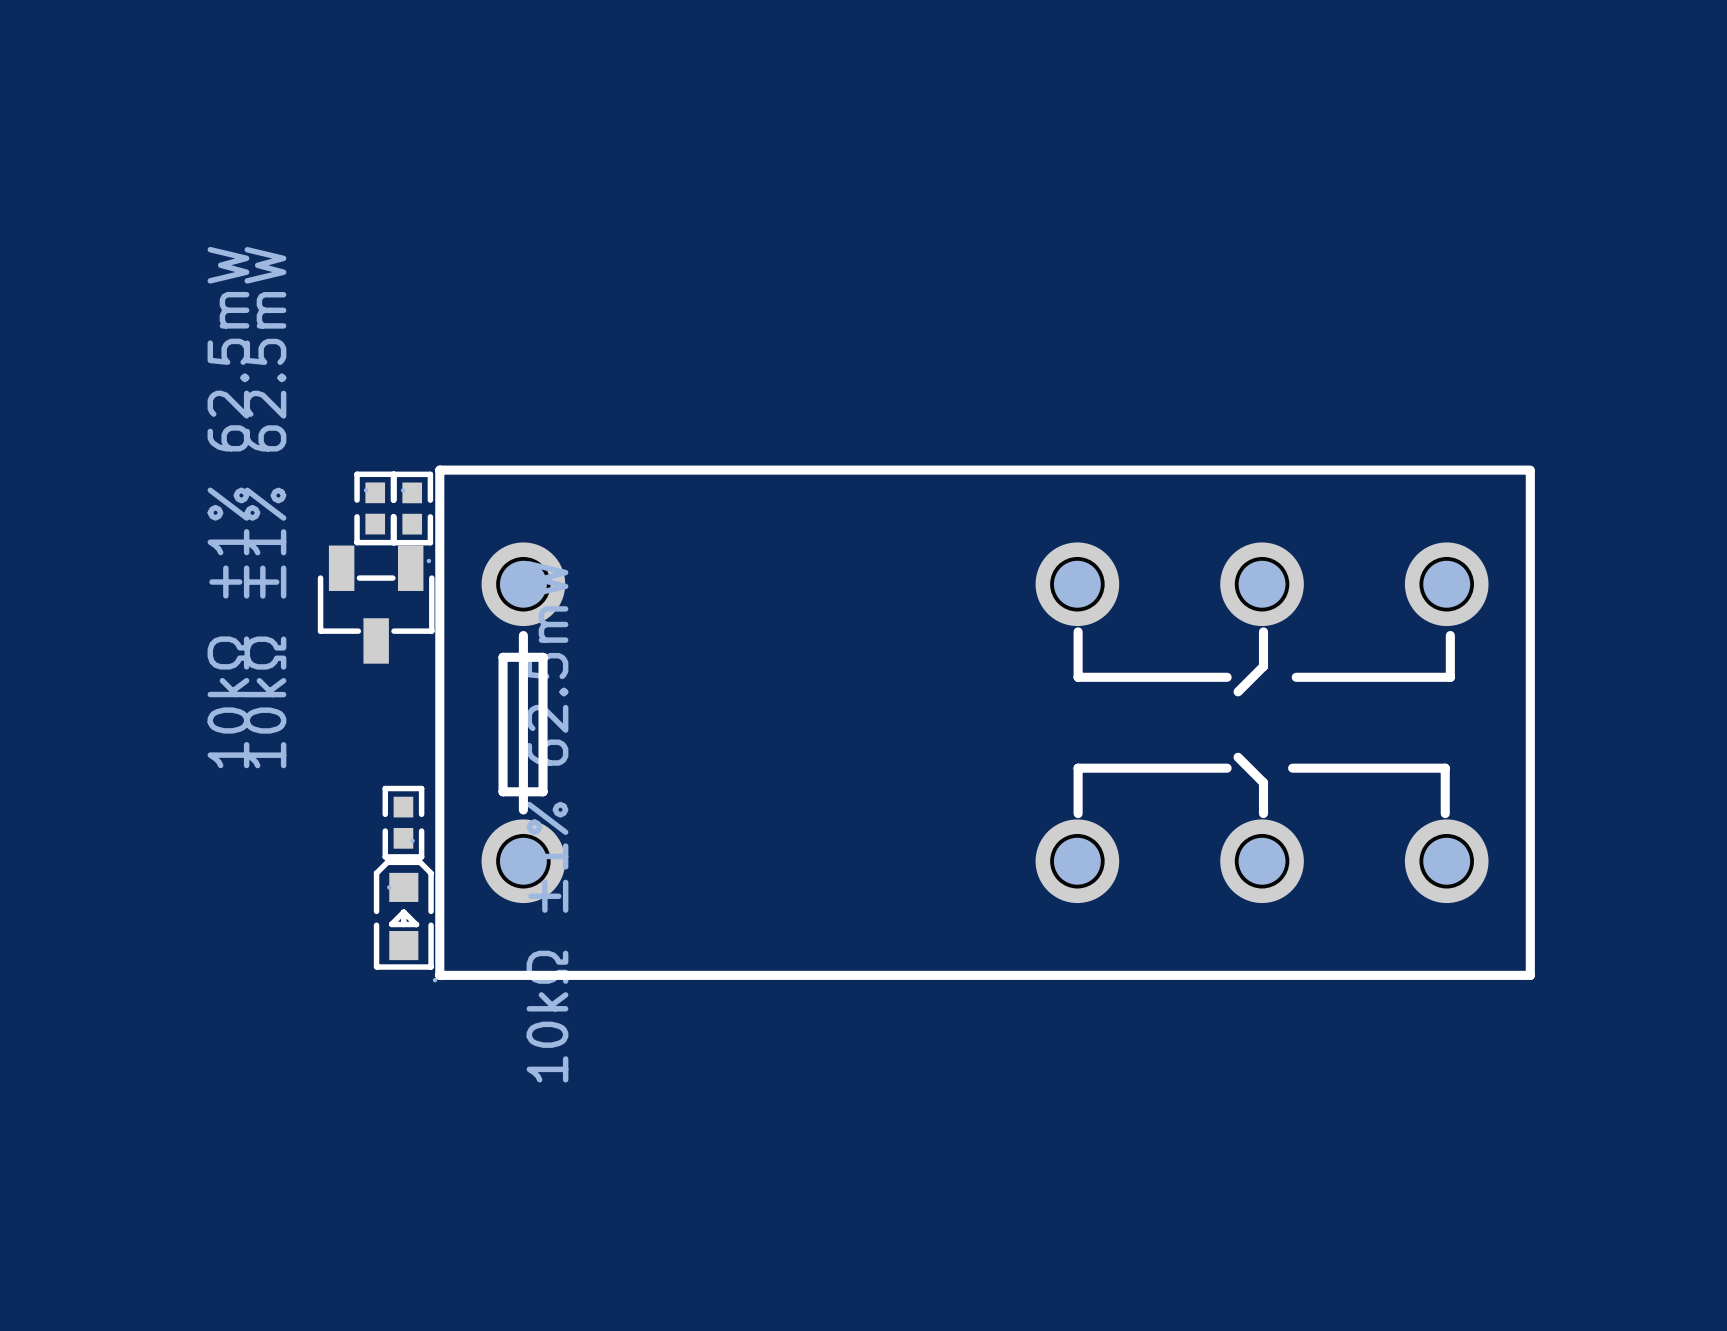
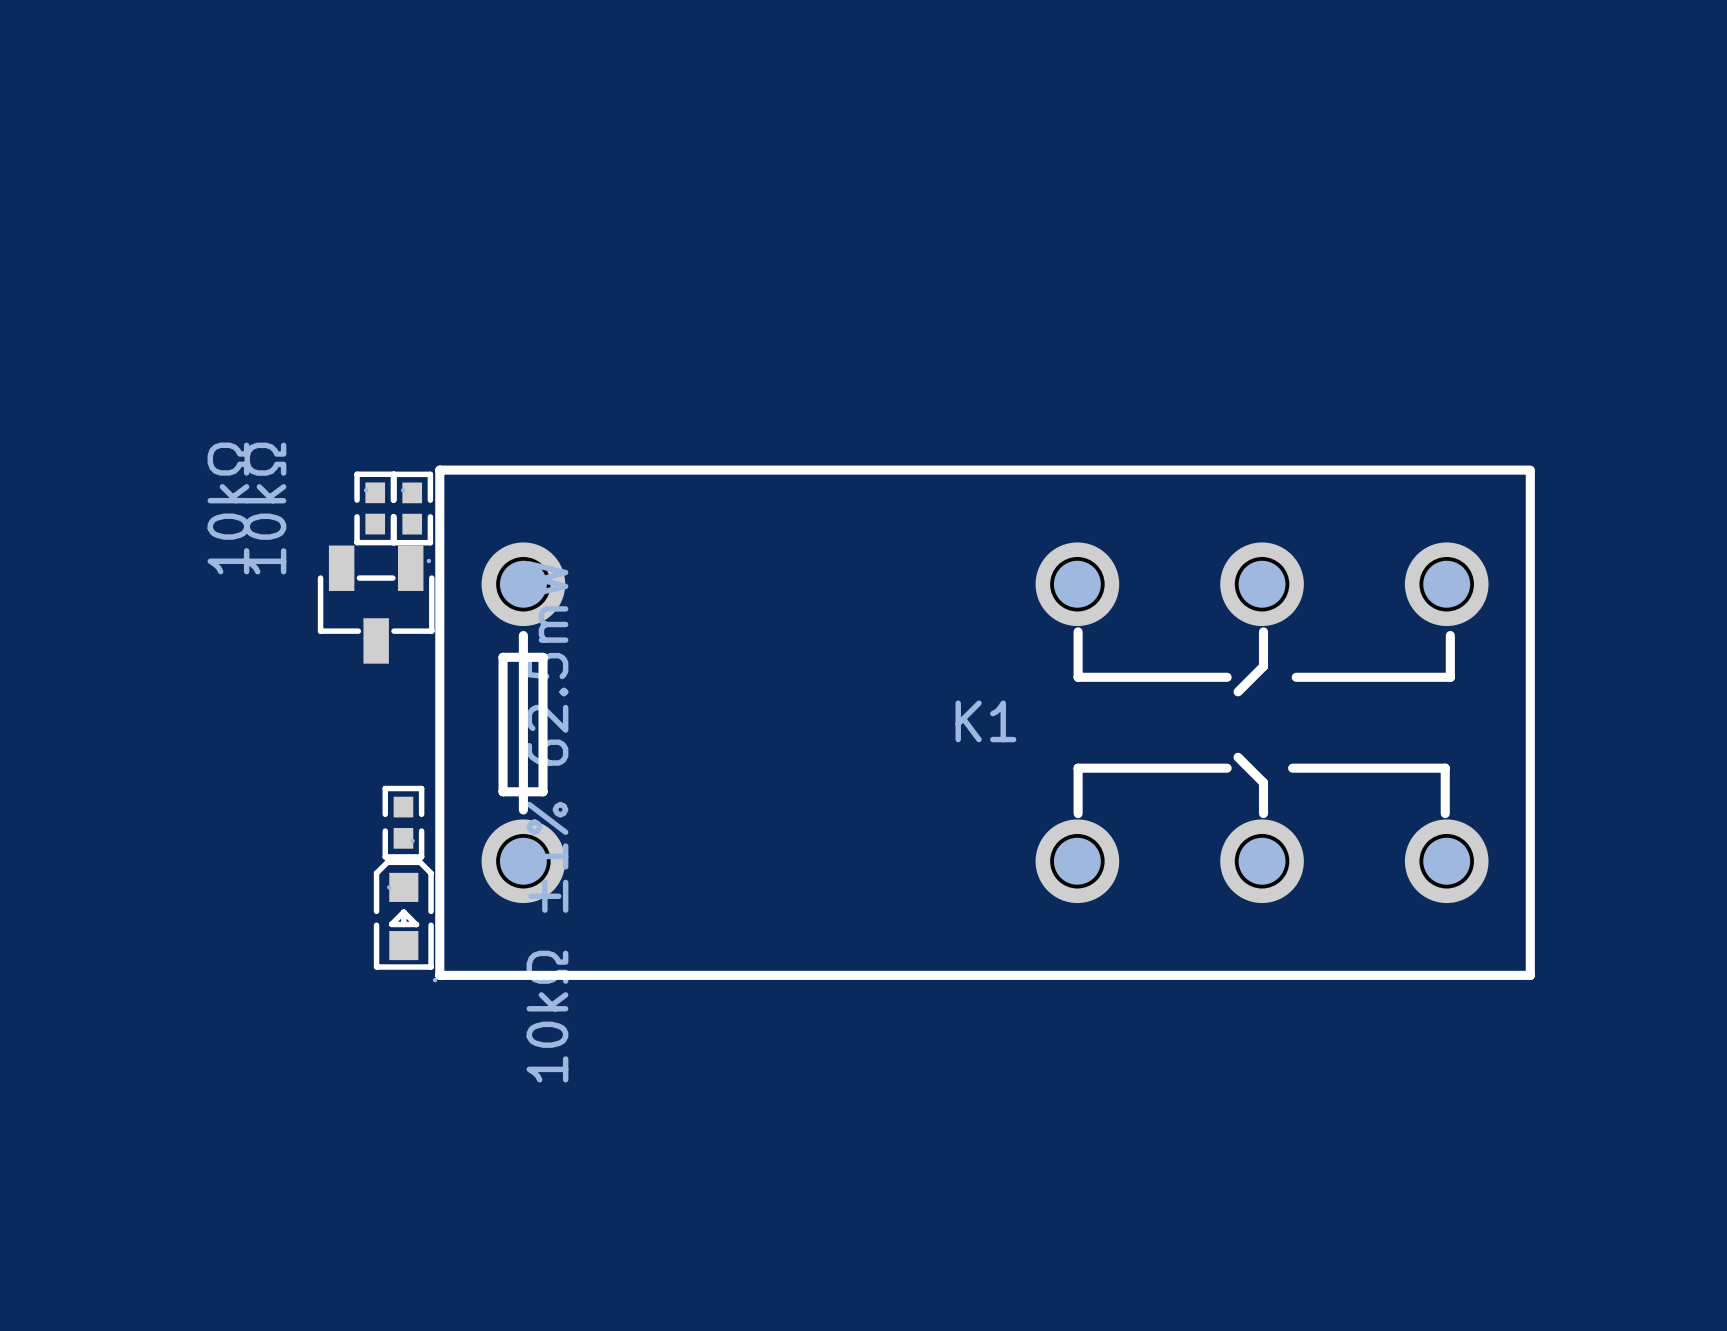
part value: 10kΩ ±1% 62.5mW (228, 507) -> 10kΩ (228, 508)
part value: 10kΩ ±1% 62.5mW (265, 507) -> 10kΩ (265, 508)
K1 name: none -> K1 (985, 721)

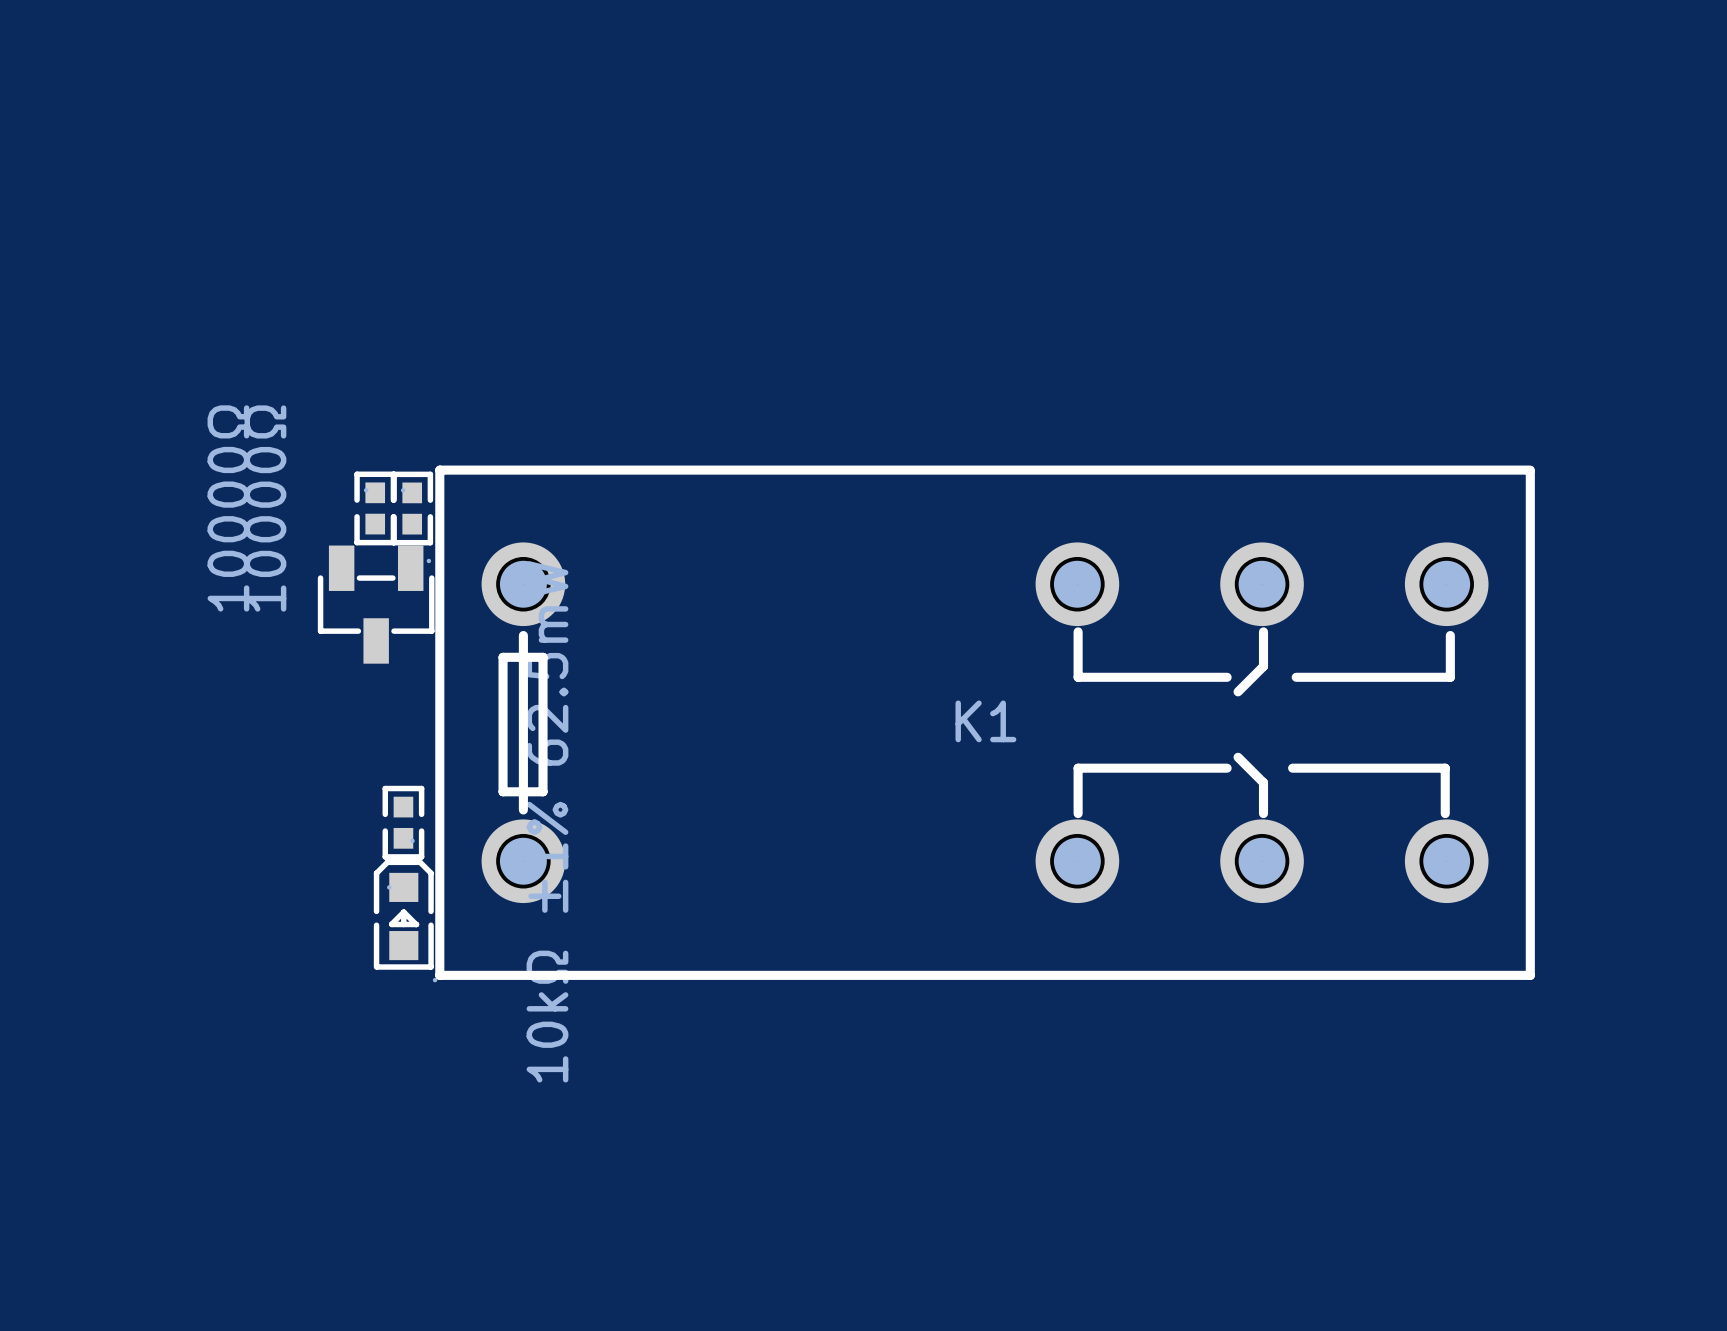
part value: 10kΩ (228, 508) -> 10000Ω (228, 508)
part value: 10kΩ (265, 508) -> 10000Ω (265, 508)

